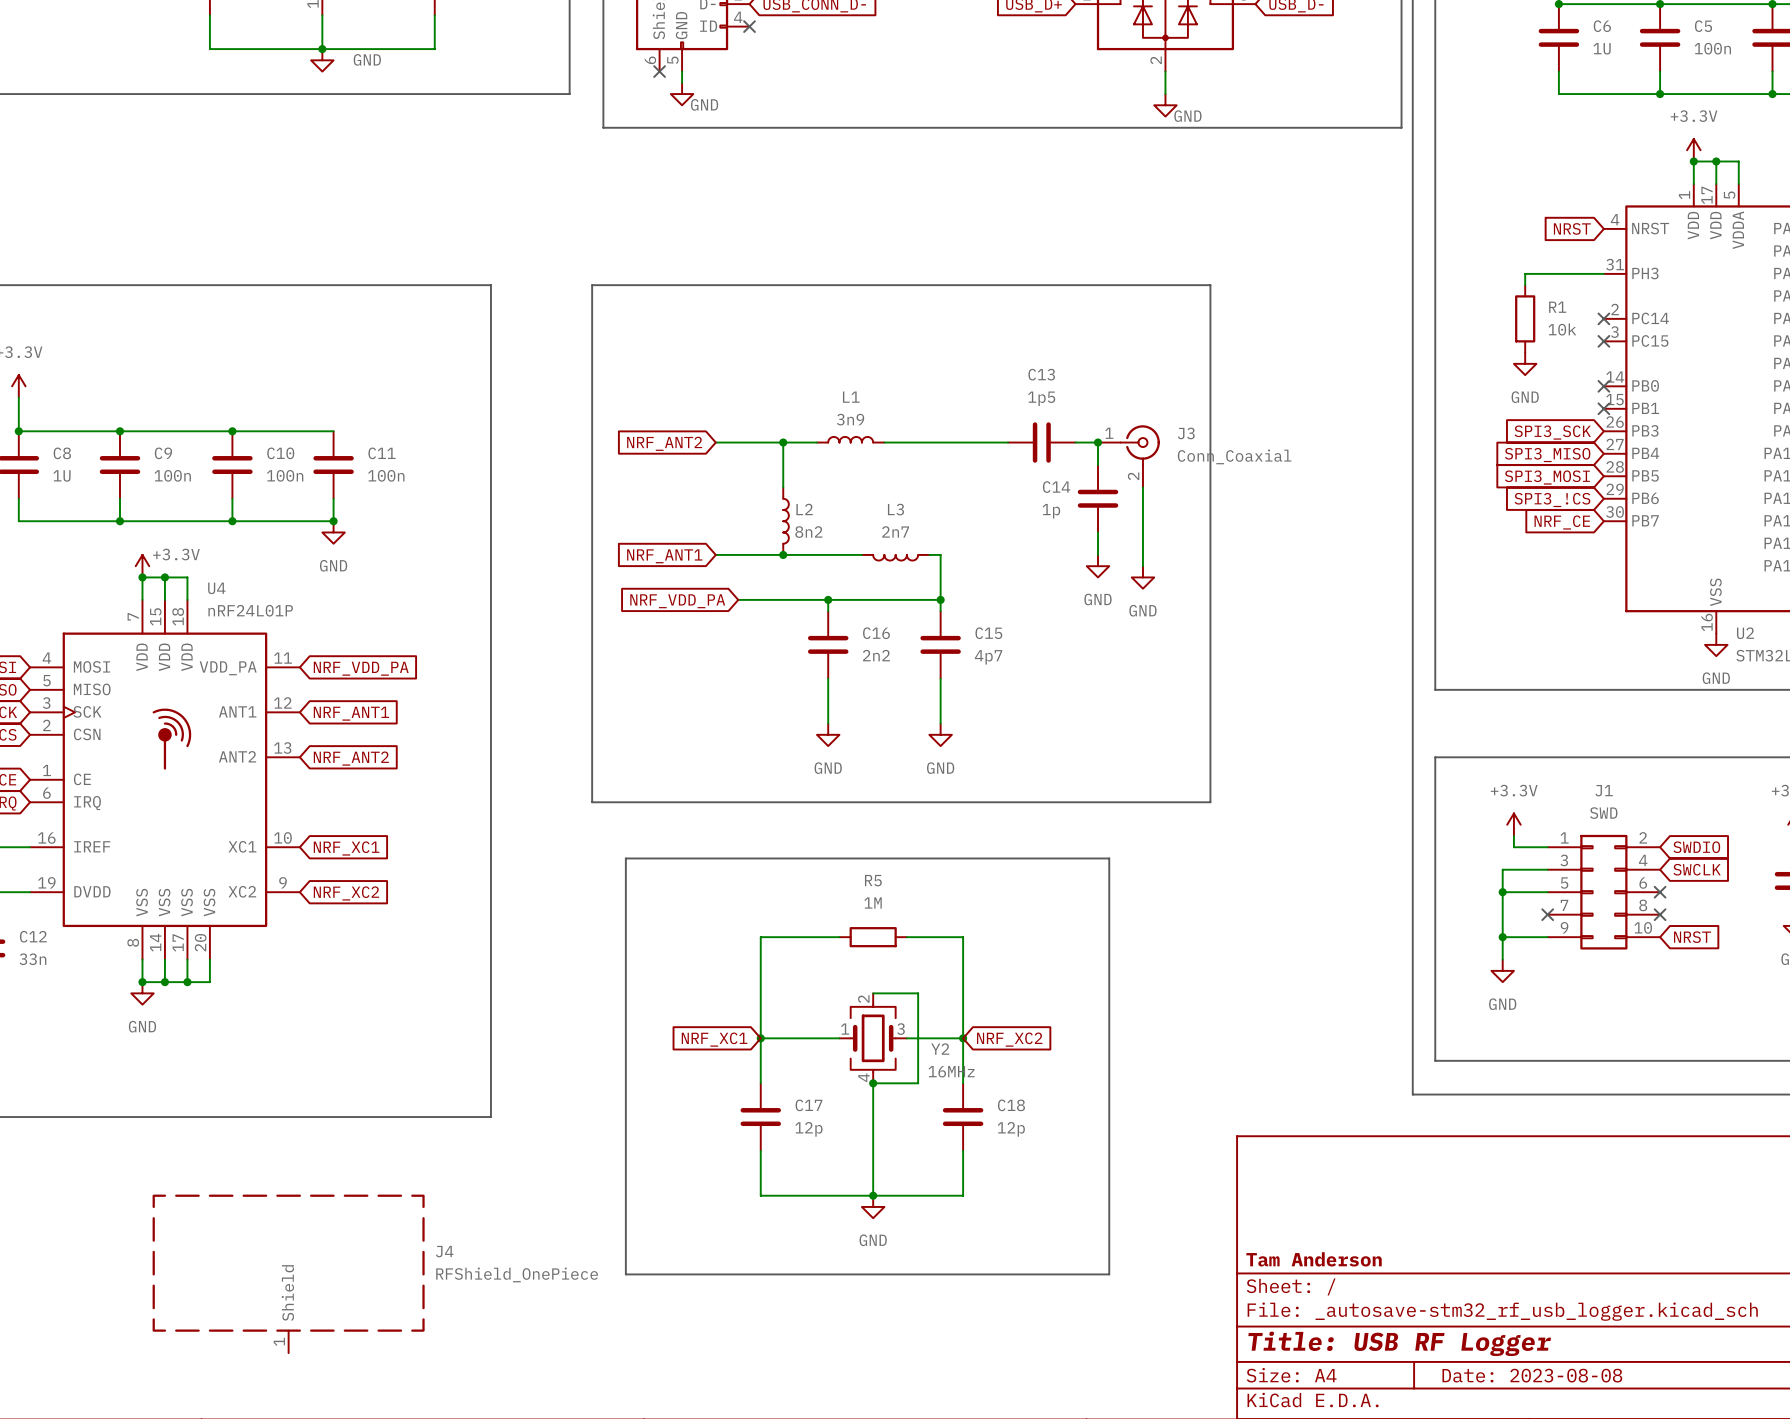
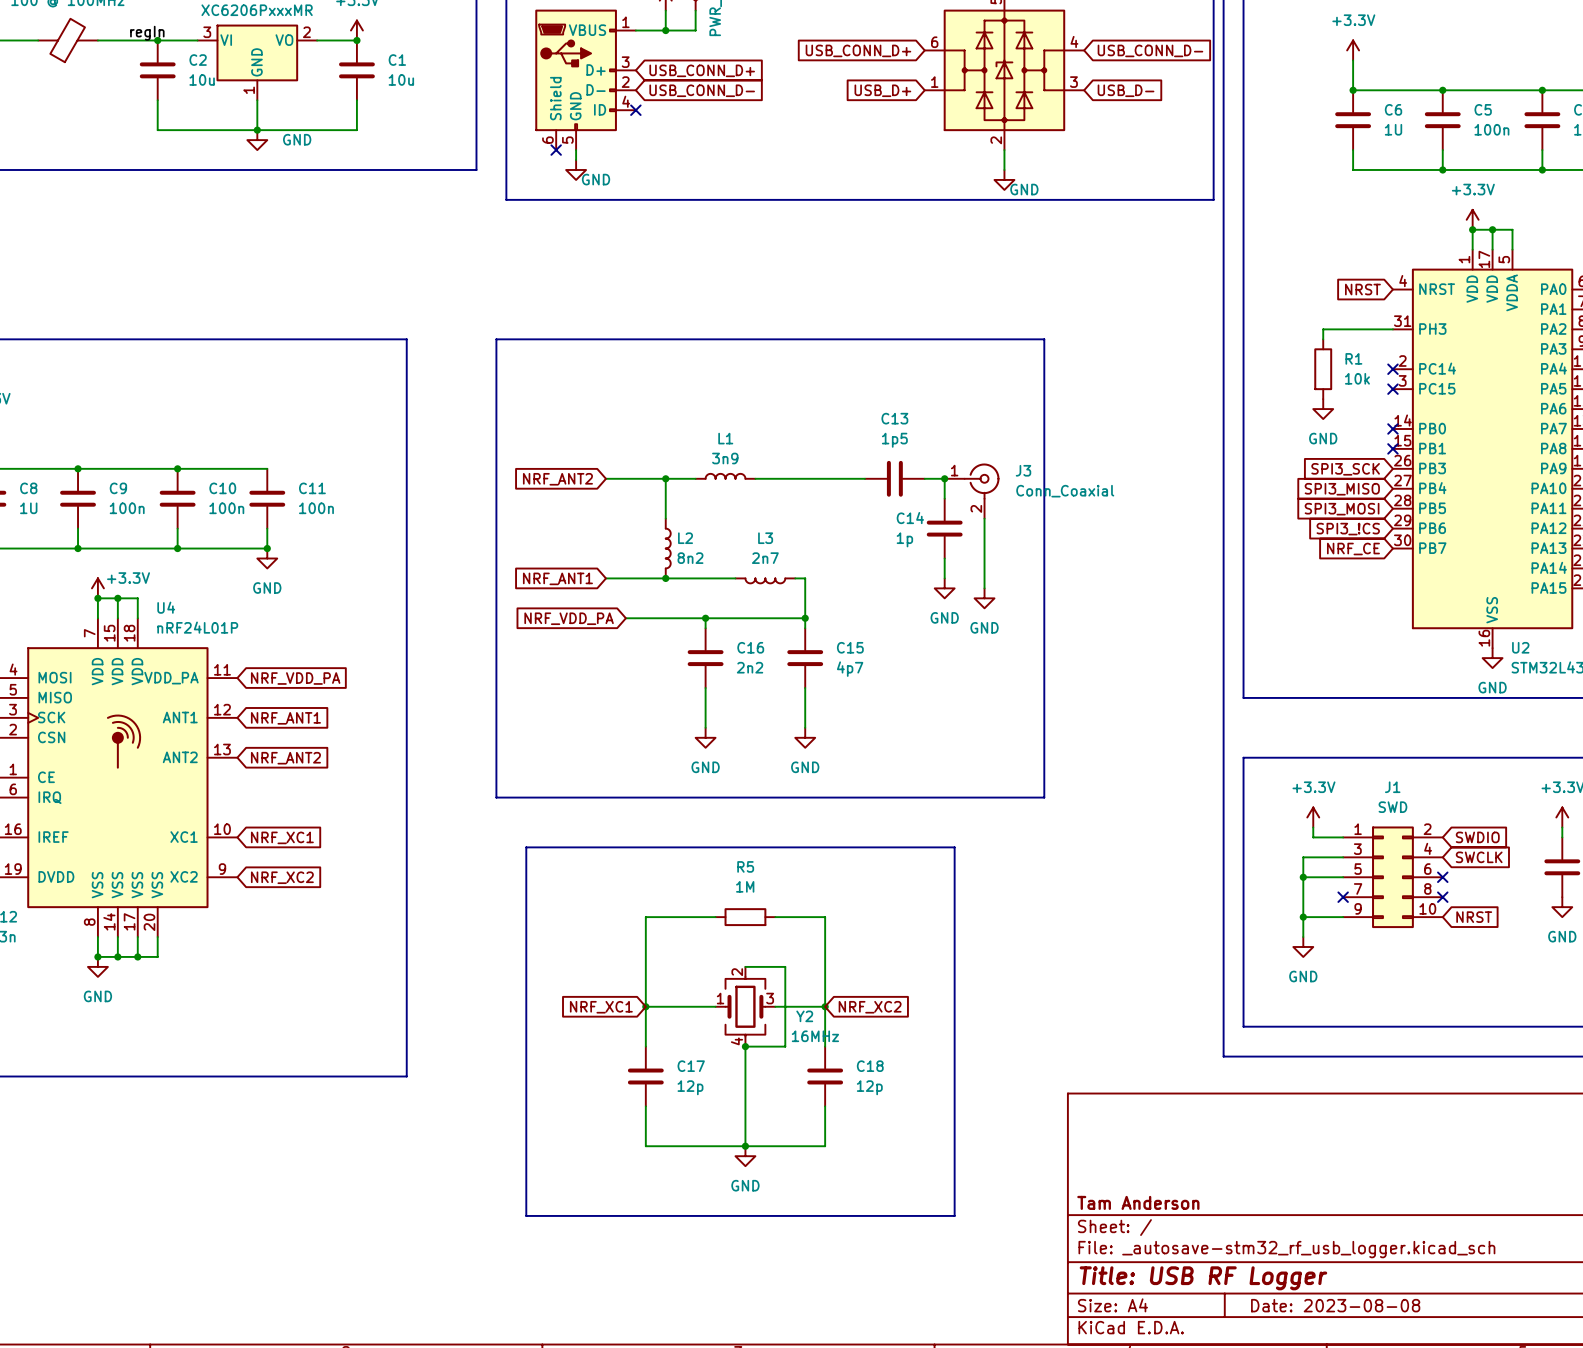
J4: RFShield_OnePiece (288, 1273) -> none

